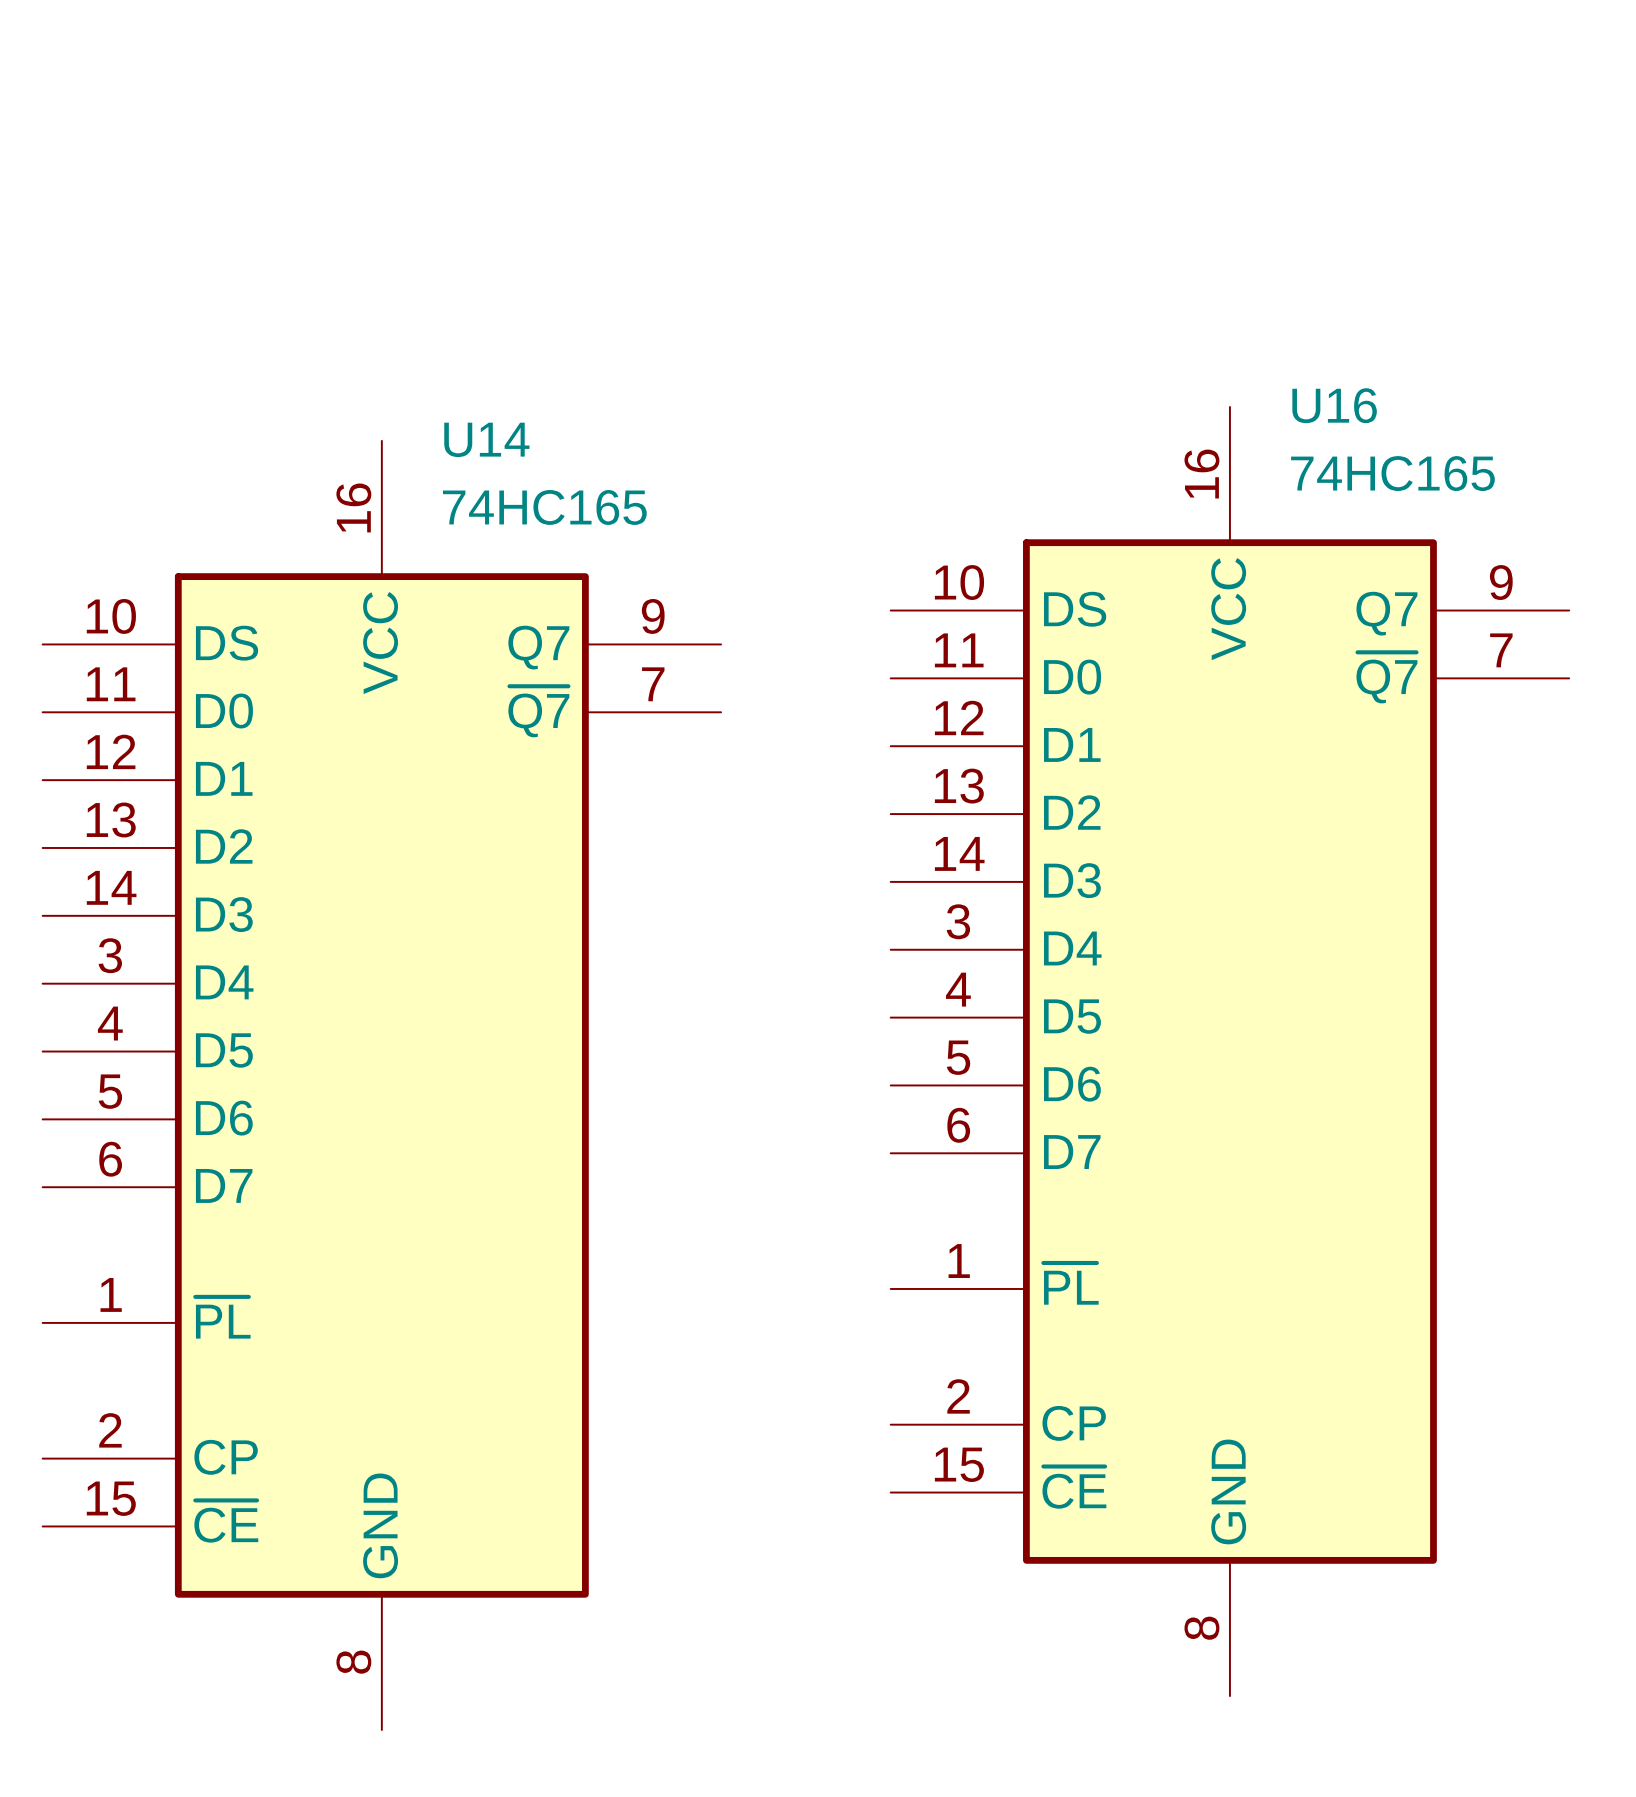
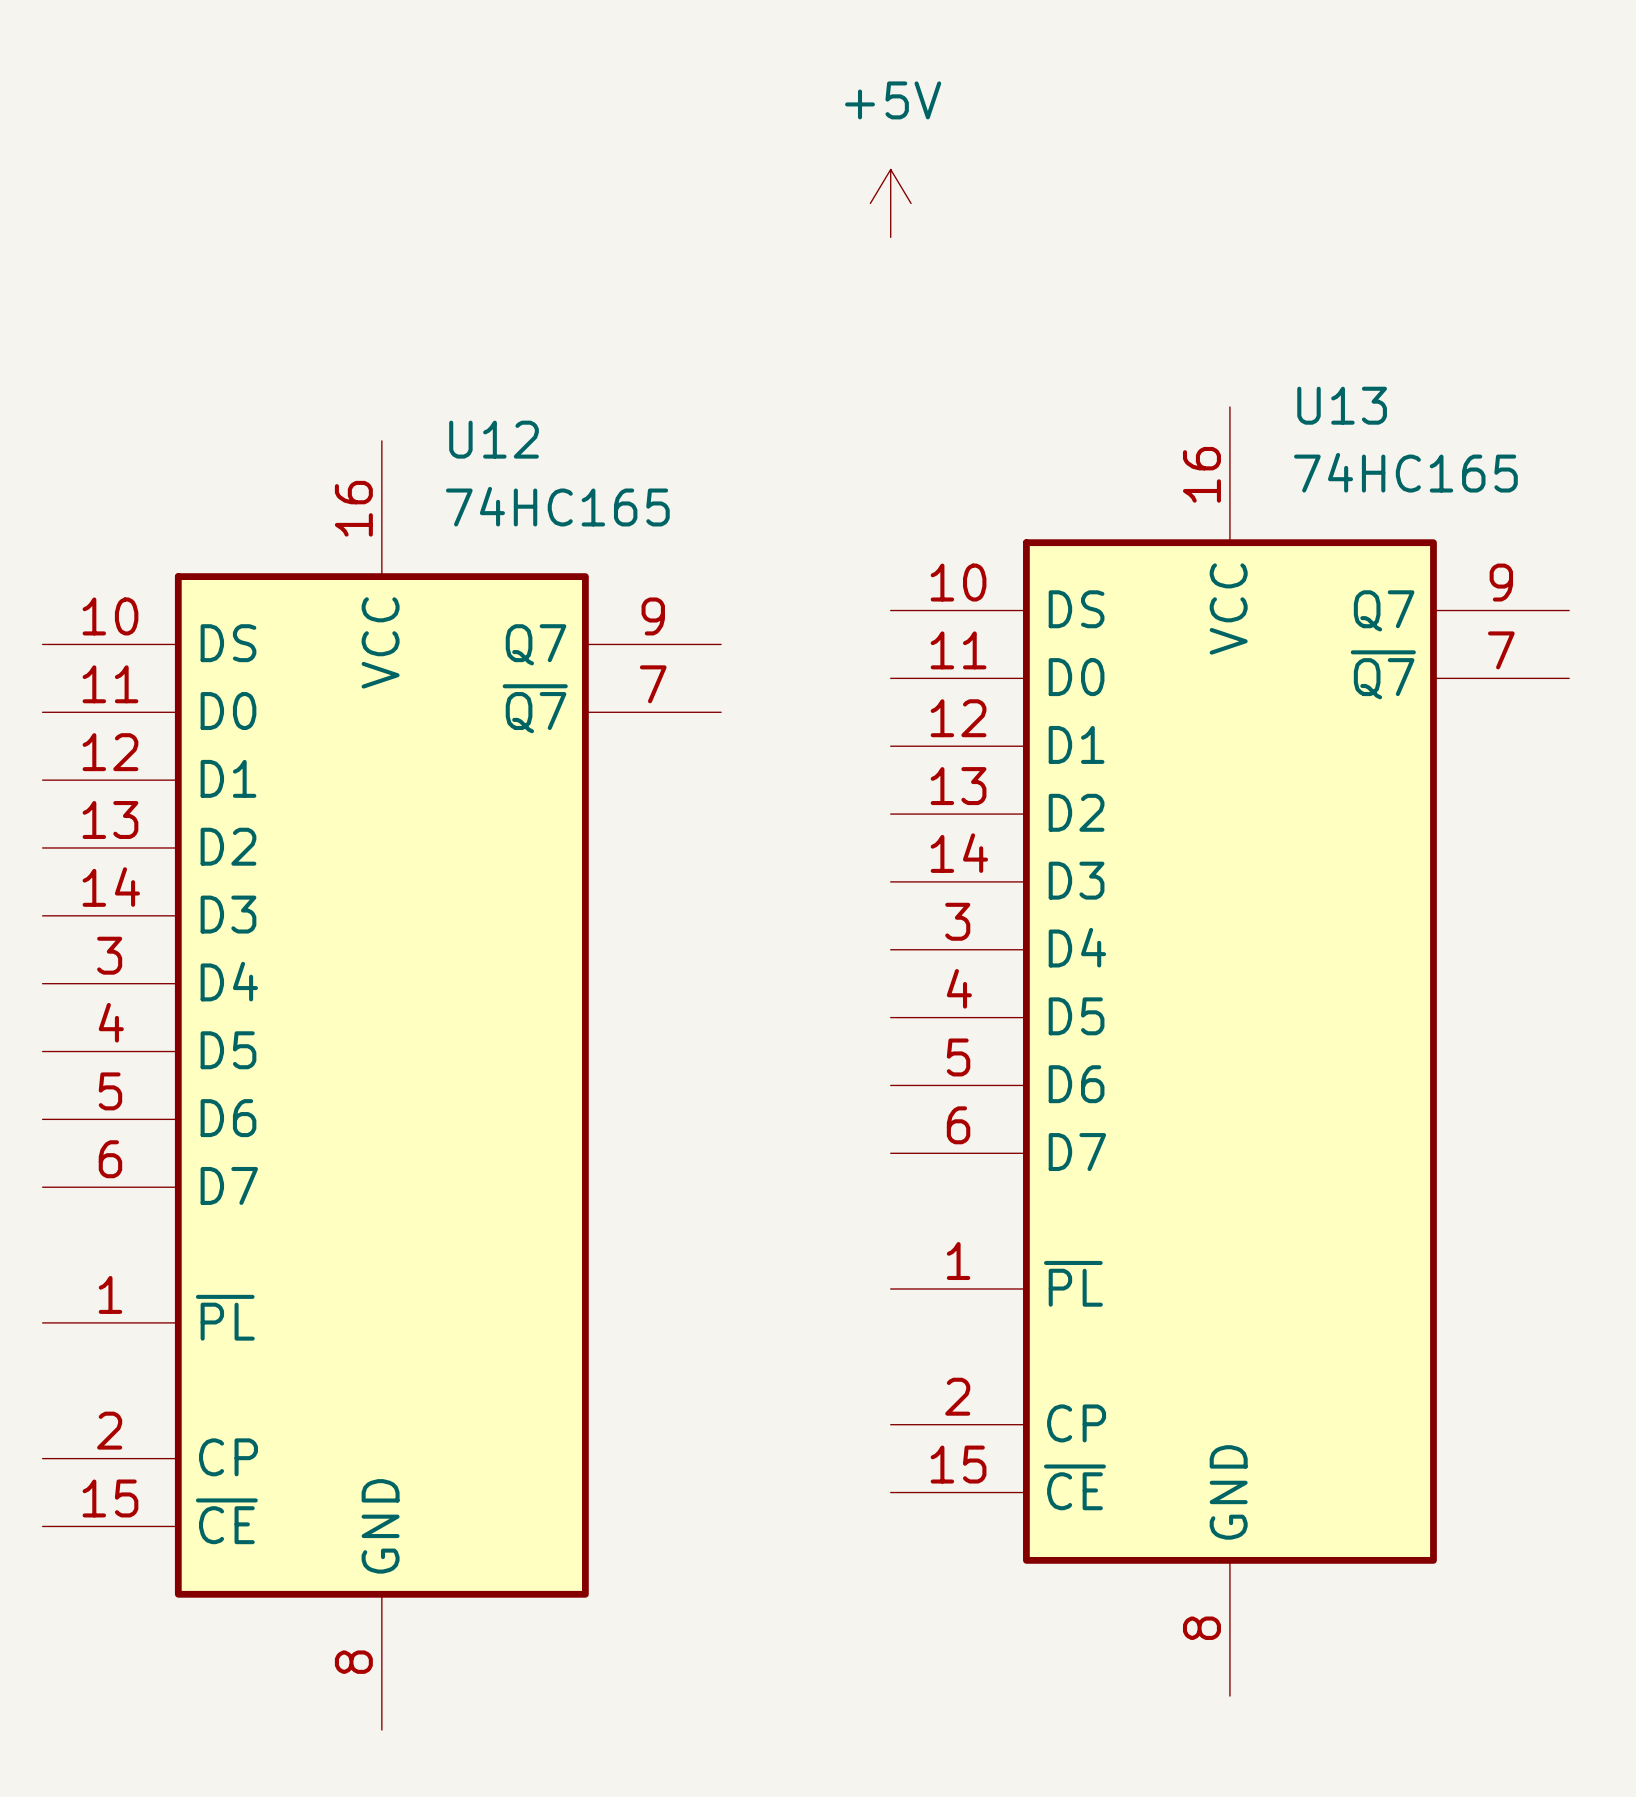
power symbol: none -> +5V (890, 203)
U16 name: U16 (1334, 405) -> U13 (1342, 405)
U14 name: U14 (486, 439) -> U12 (494, 439)

